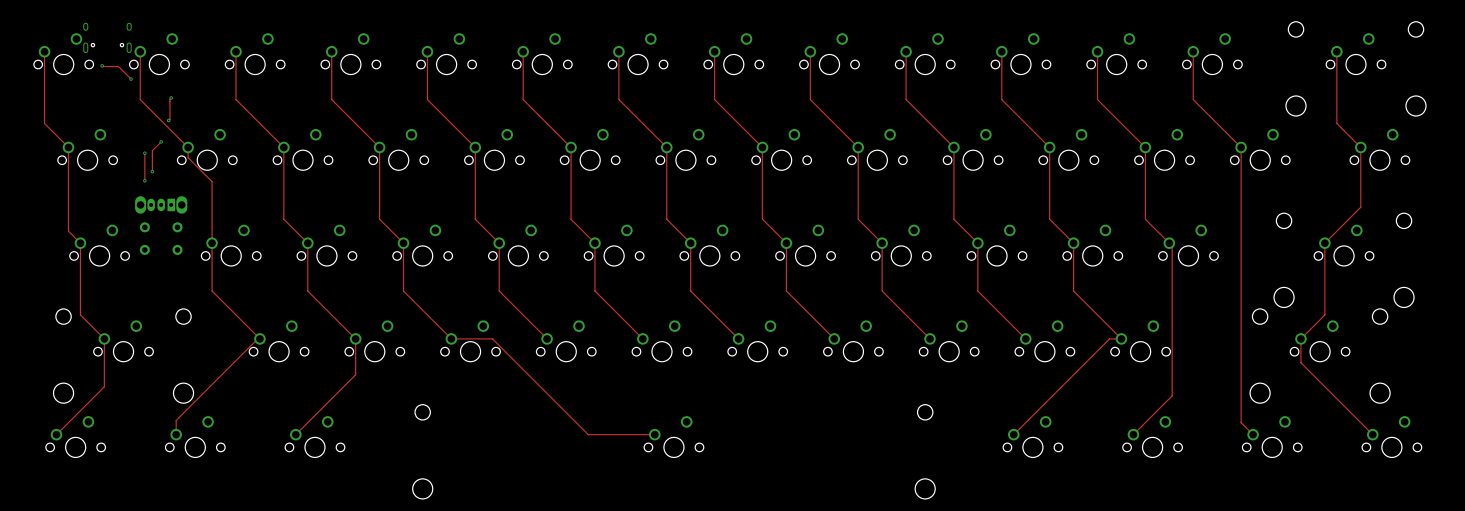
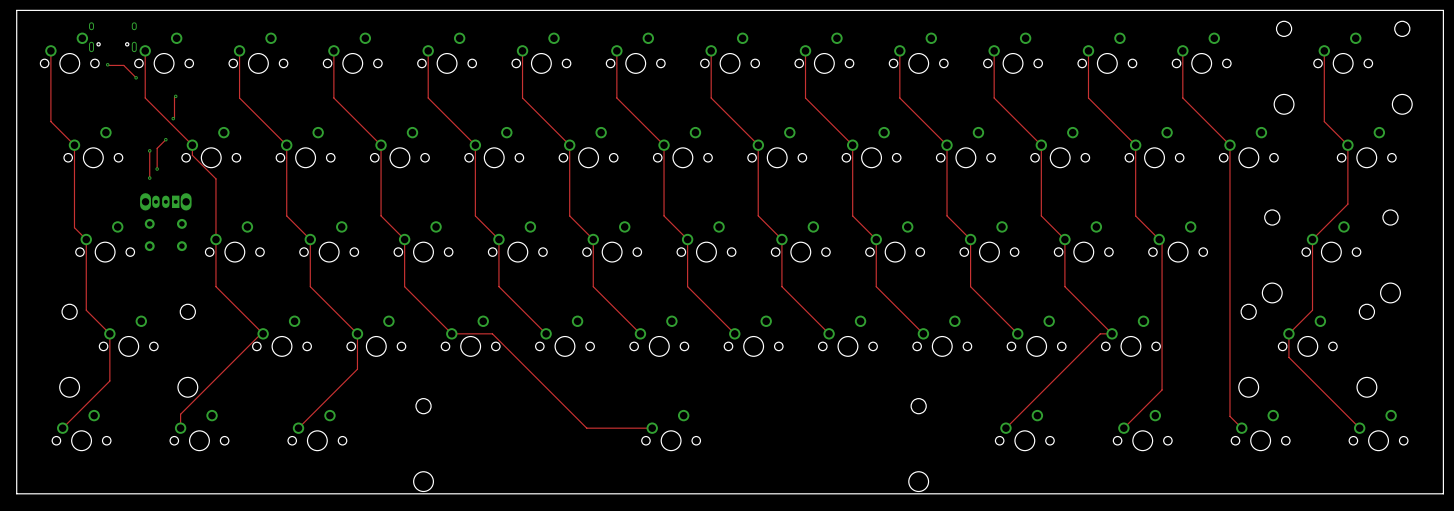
board edge: none -> (16, 10) (1443, 10) (1443, 493) (16, 493) (16, 10)

